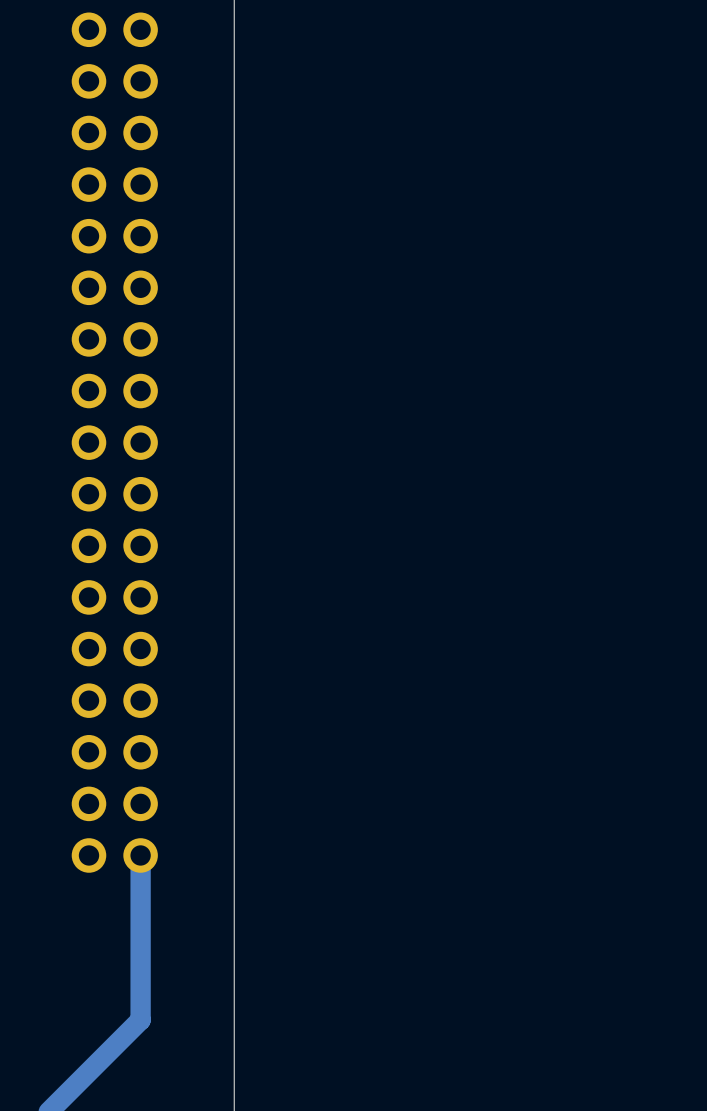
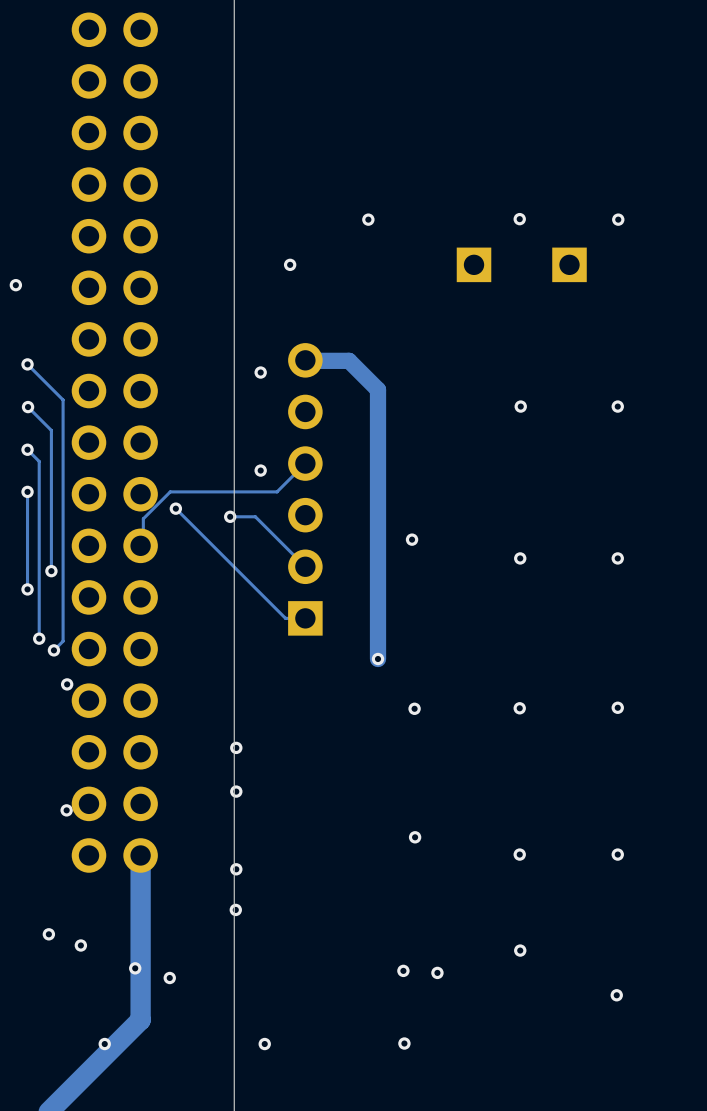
via: none -> (368, 219)
via: none -> (519, 219)
via: none -> (618, 219)
via: none -> (290, 264)
part: none -> (474, 264)
part: none -> (569, 264)
via: none -> (15, 285)
track: none -> (305, 360) (349, 360) (378, 389) (378, 659)
track: none -> (27, 364) (63, 399) (63, 641) (53, 650)
via: none -> (27, 364)
via: none -> (260, 372)
via: none -> (520, 406)
via: none -> (617, 406)
track: none -> (28, 407) (51, 430) (51, 571)
via: none -> (28, 407)
track: none -> (27, 449) (39, 461) (39, 638)
via: none -> (27, 449)
track: none -> (305, 463) (277, 491) (170, 491) (143, 518) (143, 558)
via: none -> (260, 470)
part: none -> (305, 489)
track: none -> (27, 491) (27, 589)
via: none -> (27, 491)
track: none -> (175, 508) (285, 618) (305, 618)
via: none -> (175, 508)
track: none -> (230, 516) (255, 516) (305, 566)
via: none -> (230, 516)
via: none -> (412, 539)
via: none -> (520, 558)
via: none -> (617, 558)
via: none -> (51, 571)
via: none -> (27, 589)
via: none -> (39, 638)
via: none -> (53, 650)
via: none -> (378, 659)
via: none -> (67, 684)
via: none -> (617, 707)
via: none -> (414, 708)
via: none -> (519, 708)
via: none -> (236, 747)
via: none -> (236, 791)
via: none -> (66, 810)
via: none -> (415, 837)
via: none -> (519, 854)
via: none -> (617, 854)
via: none -> (236, 869)
via: none -> (235, 909)
via: none -> (48, 934)
via: none -> (80, 945)
via: none -> (520, 950)
via: none -> (135, 968)
via: none -> (403, 970)
via: none -> (437, 972)
via: none -> (169, 977)
via: none -> (616, 995)
via: none -> (404, 1043)
via: none -> (104, 1044)
via: none -> (264, 1044)

